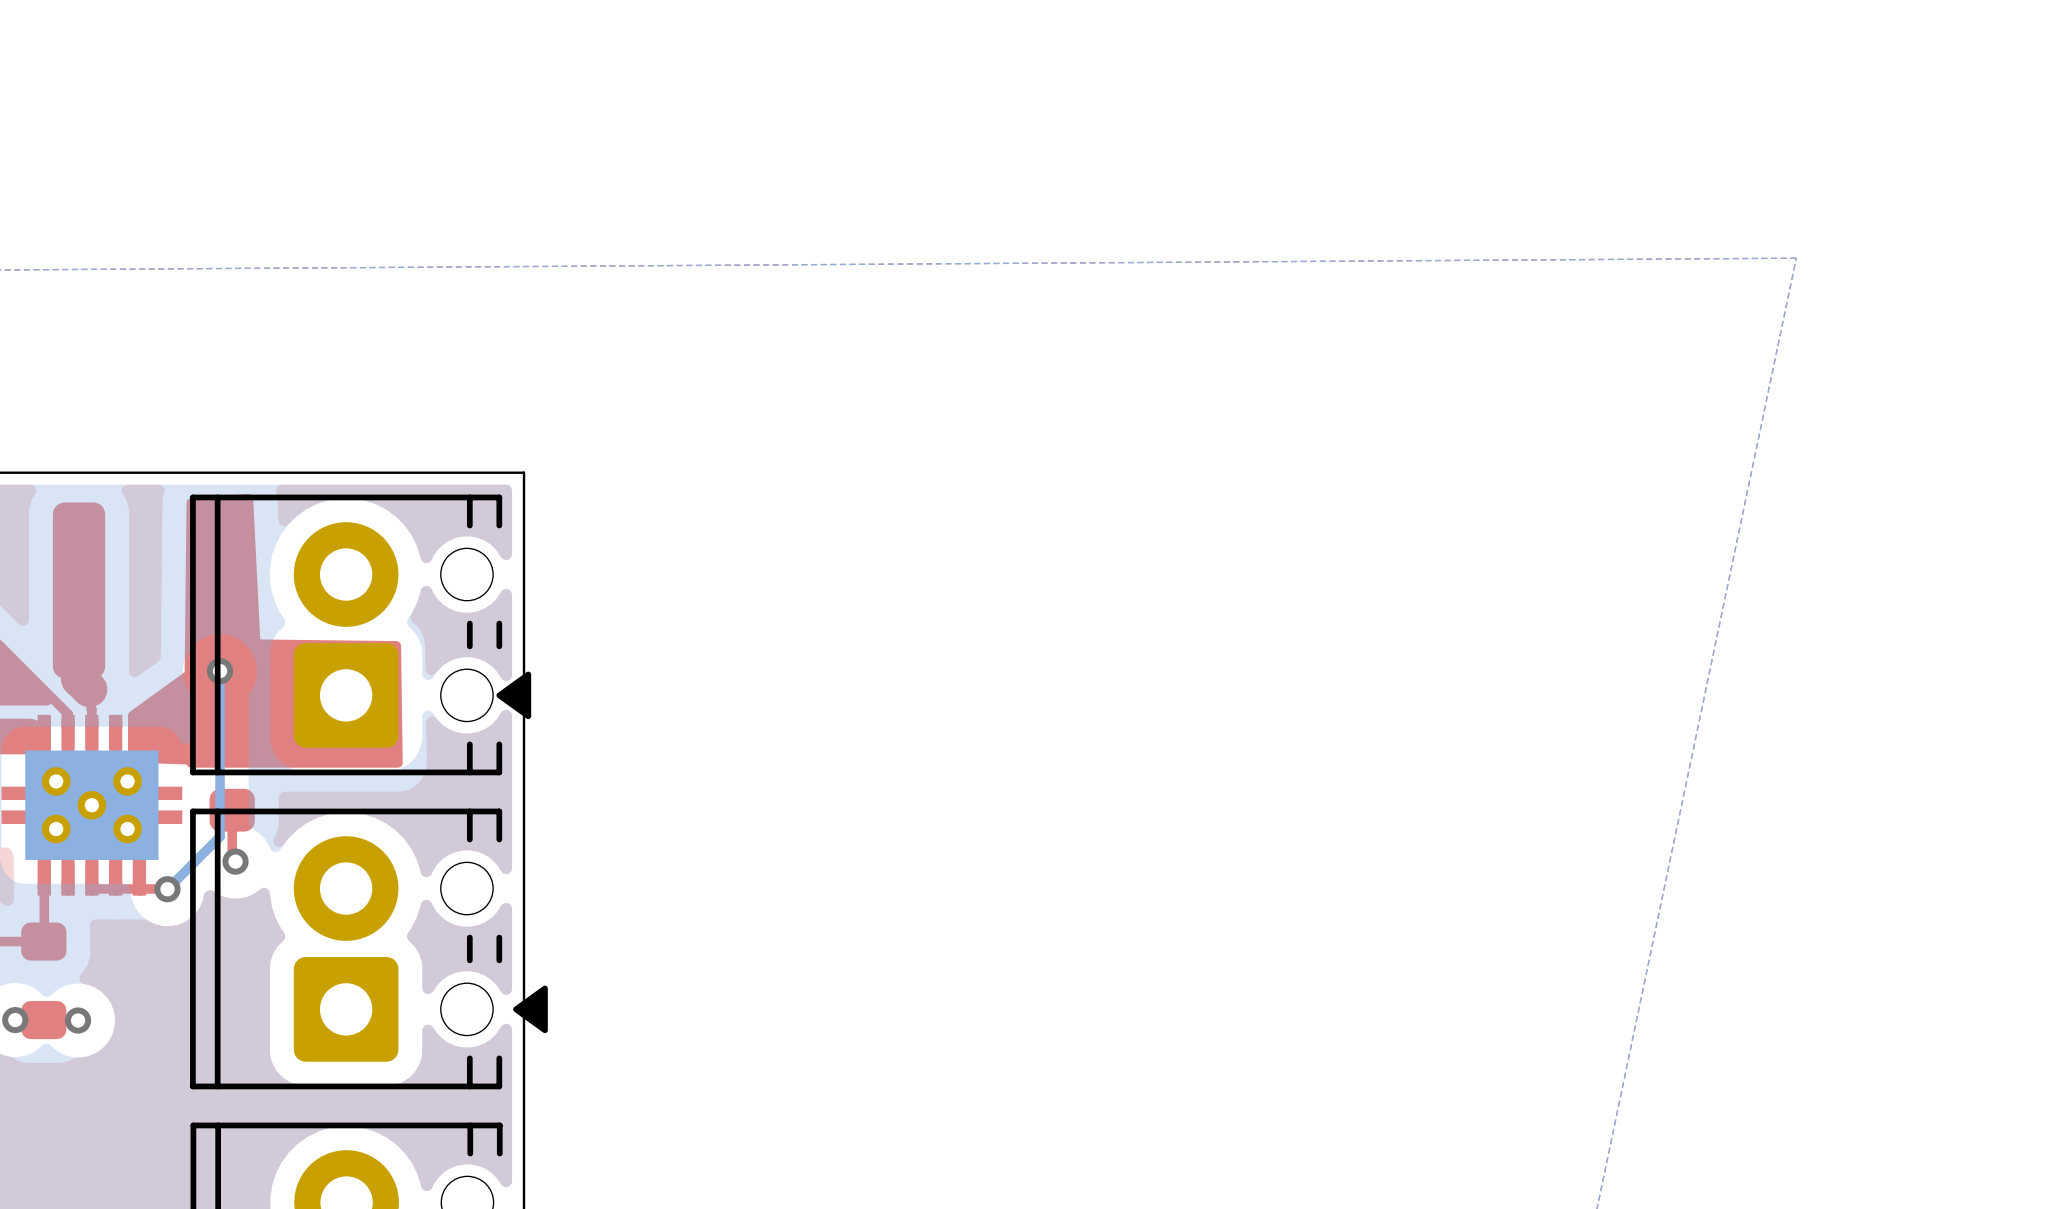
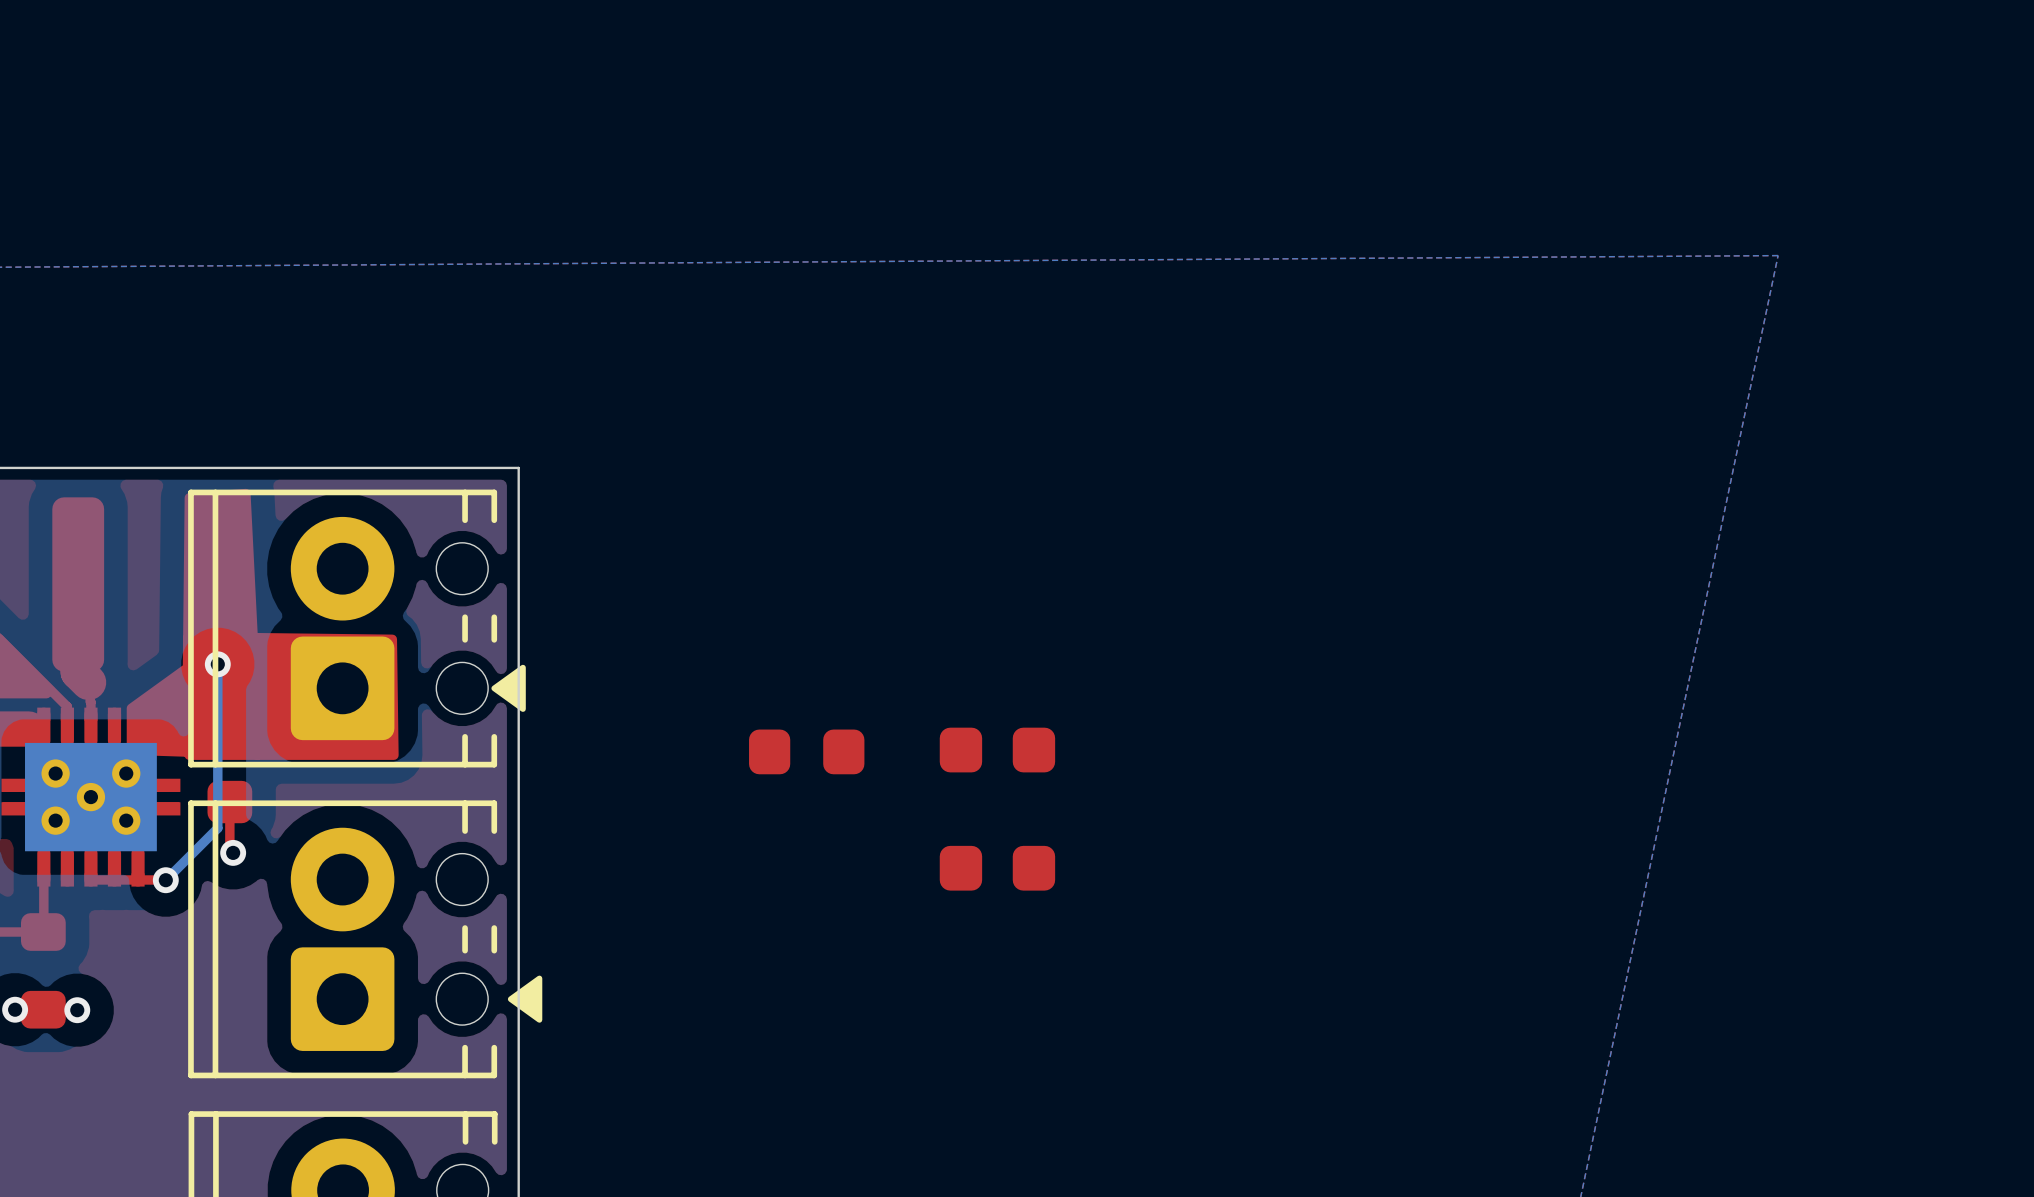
part: none -> (997, 750)
part: none -> (806, 751)
part: none -> (997, 868)

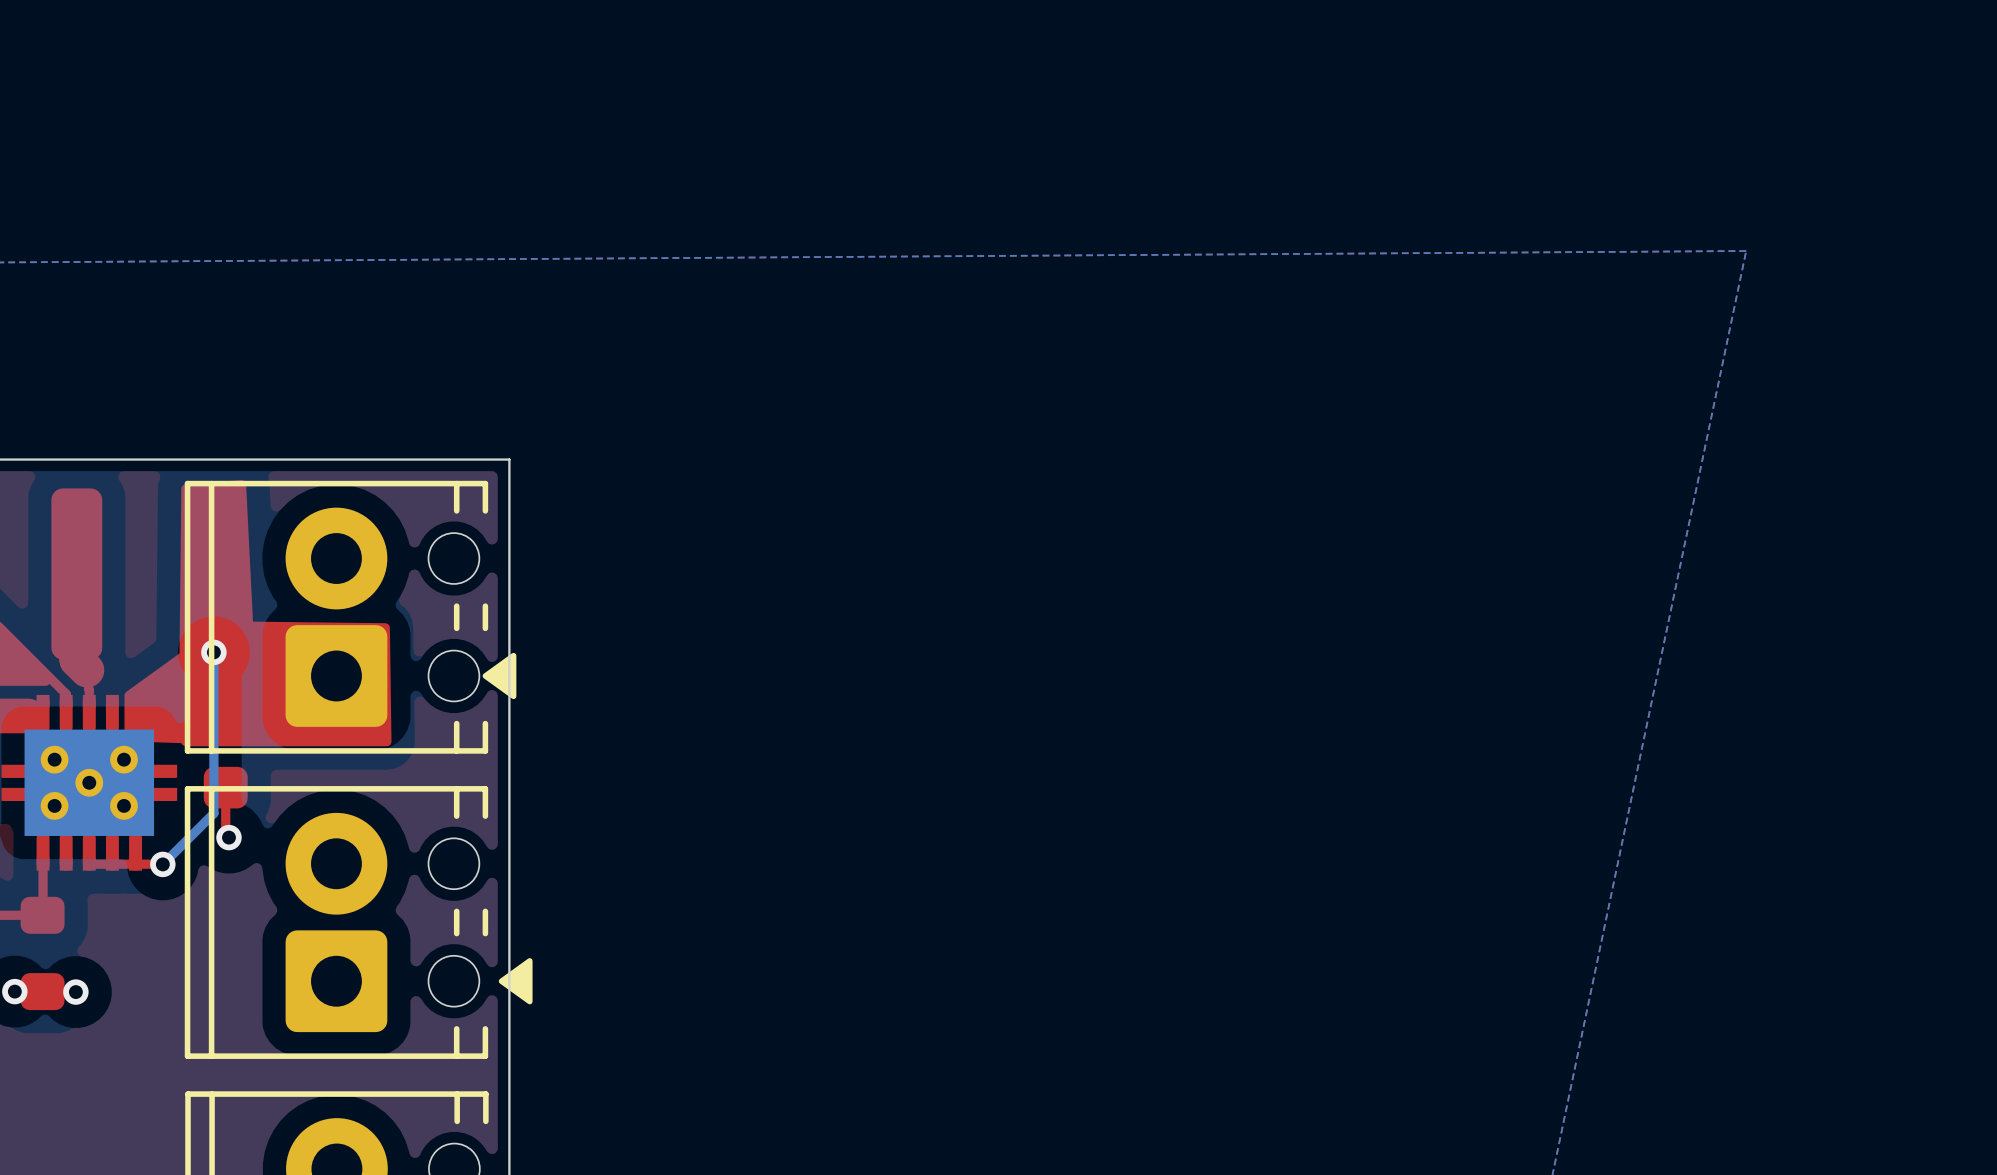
part: (997, 750) -> none
part: (806, 751) -> none
part: (997, 868) -> none

